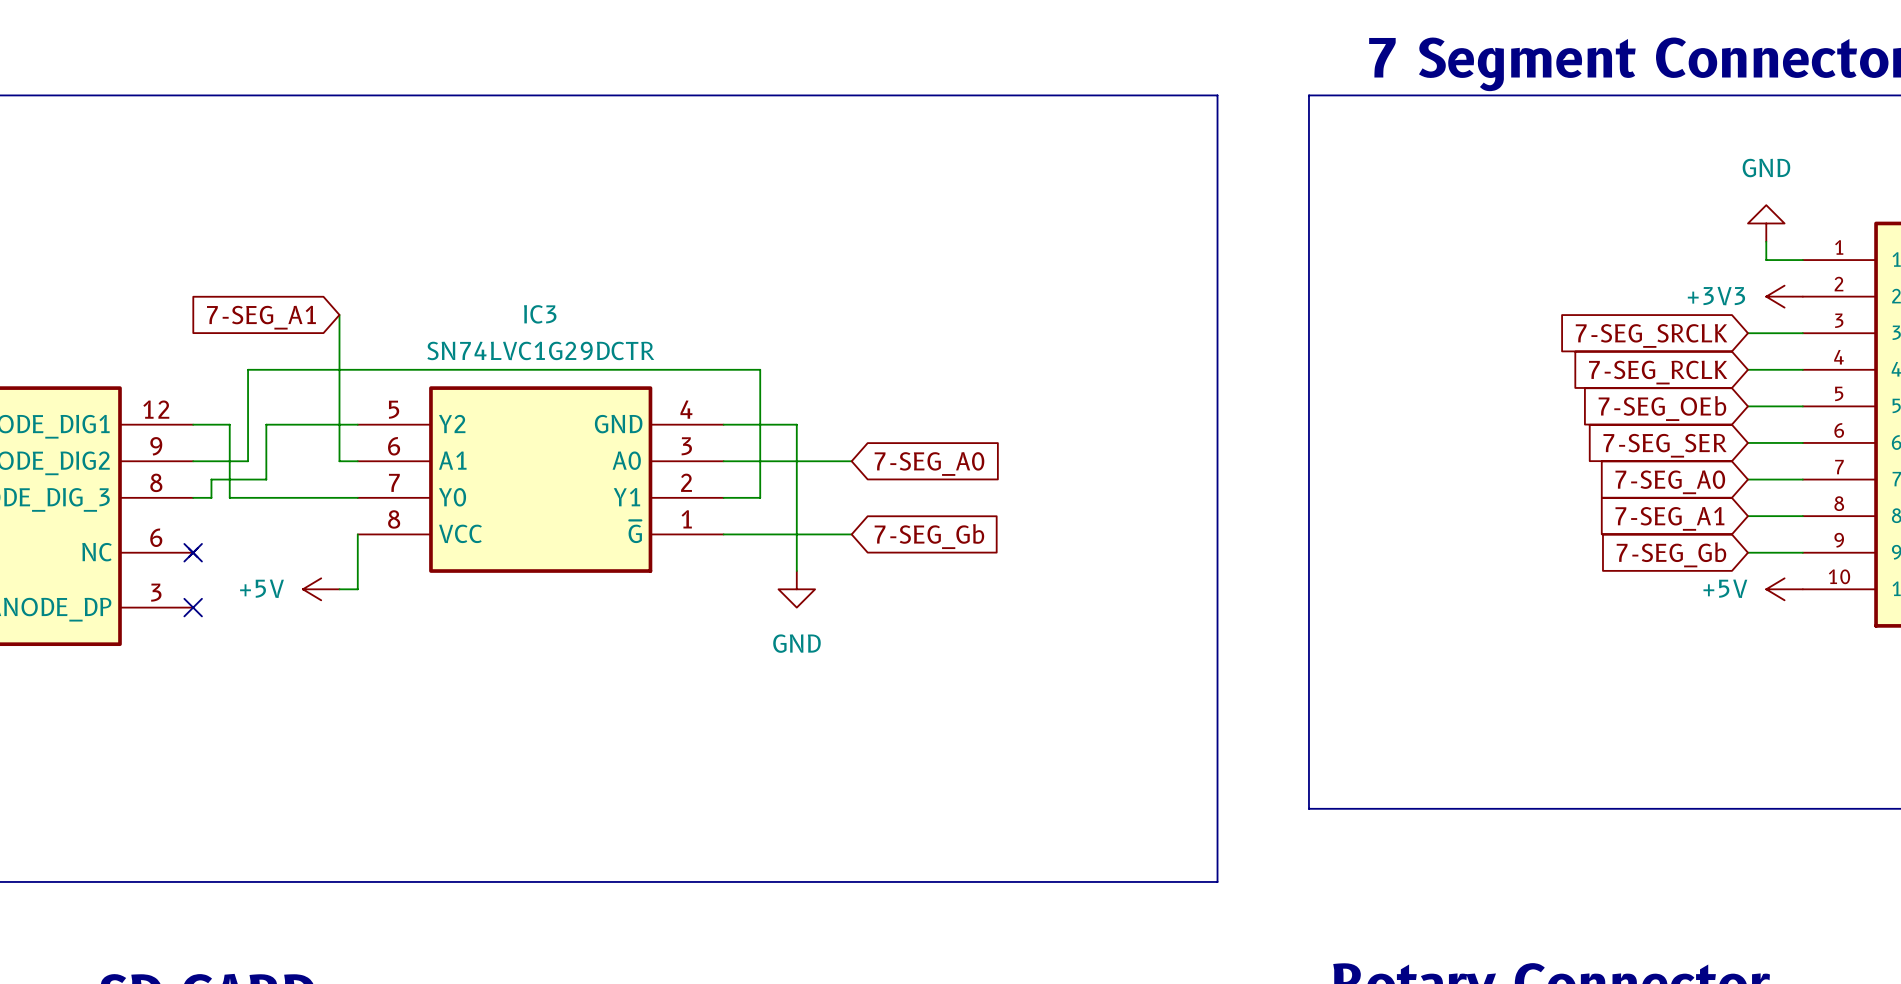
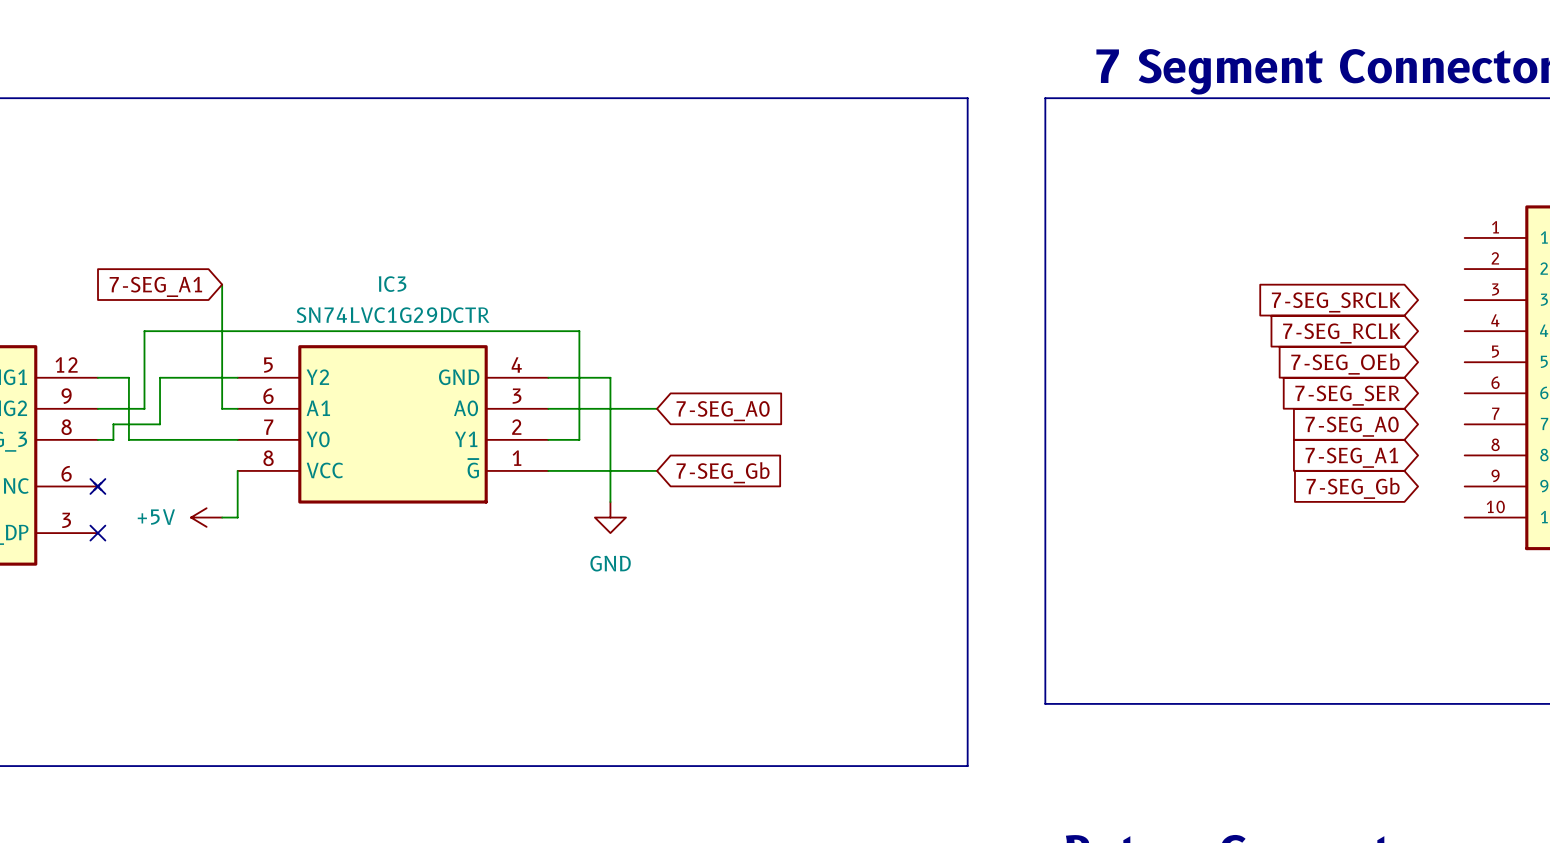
power symbol: GND (1766, 223) -> none
wire: (1766, 241) (1766, 260) (1802, 260) -> none
power symbol: +3V3 (1784, 296) -> none
wire: (1747, 333) (1802, 333) -> none
wire: (1747, 369) (1802, 369) -> none
wire: (1747, 406) (1802, 406) -> none
wire: (1747, 442) (1802, 442) -> none
wire: (1747, 479) (1802, 479) -> none
wire: (1747, 516) (1802, 516) -> none
wire: (1747, 552) (1802, 552) -> none
power symbol: +5V (1784, 589) -> none

